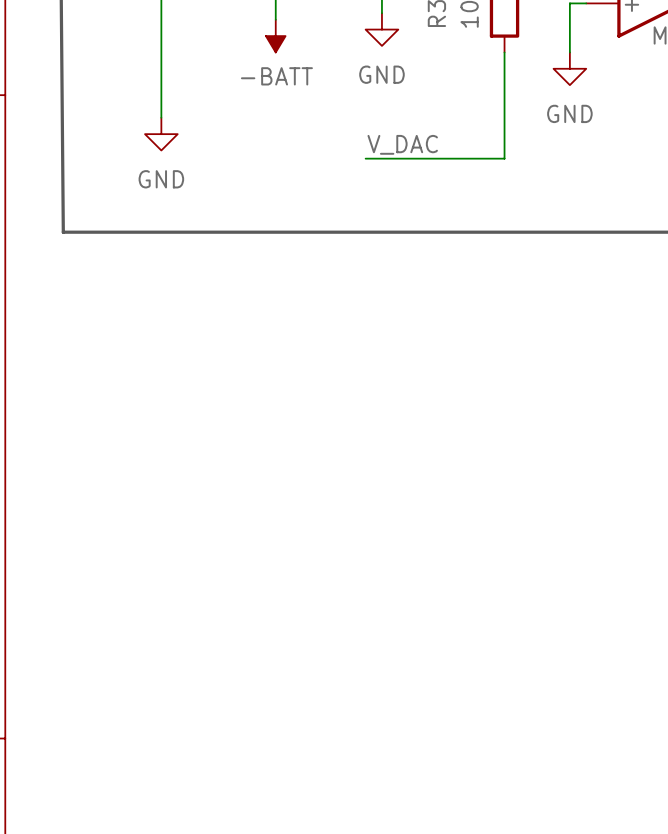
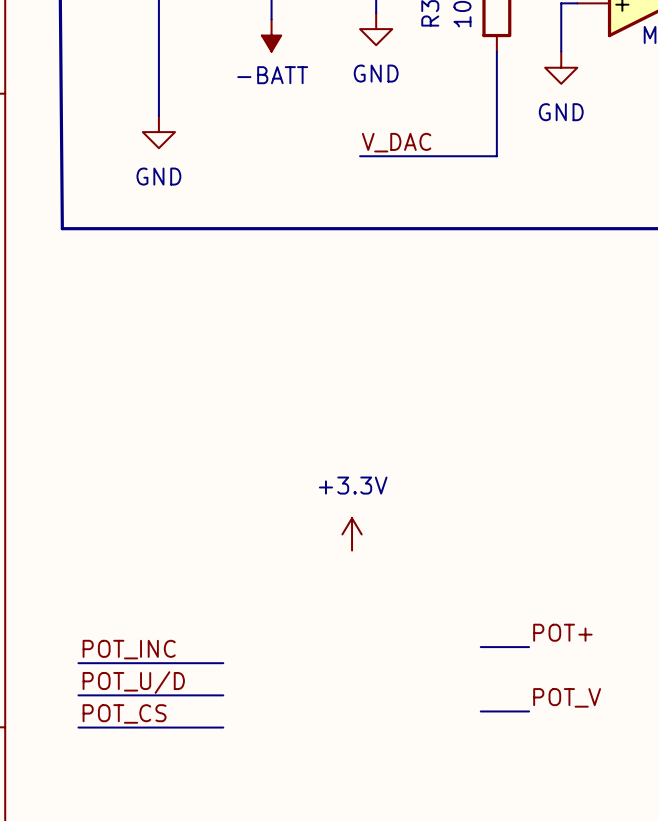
power symbol: none -> +3.3V (352, 534)
label: none -> POT+ (562, 632)
wire: none -> (480, 647) (529, 647)
label: none -> POT_INC (129, 649)
wire: none -> (78, 663) (223, 663)
label: none -> POT_U/D (133, 682)
wire: none -> (78, 695) (223, 695)
label: none -> POT_V (567, 697)
wire: none -> (480, 711) (529, 711)
label: none -> POT_CS (124, 713)
wire: none -> (78, 727) (223, 727)

